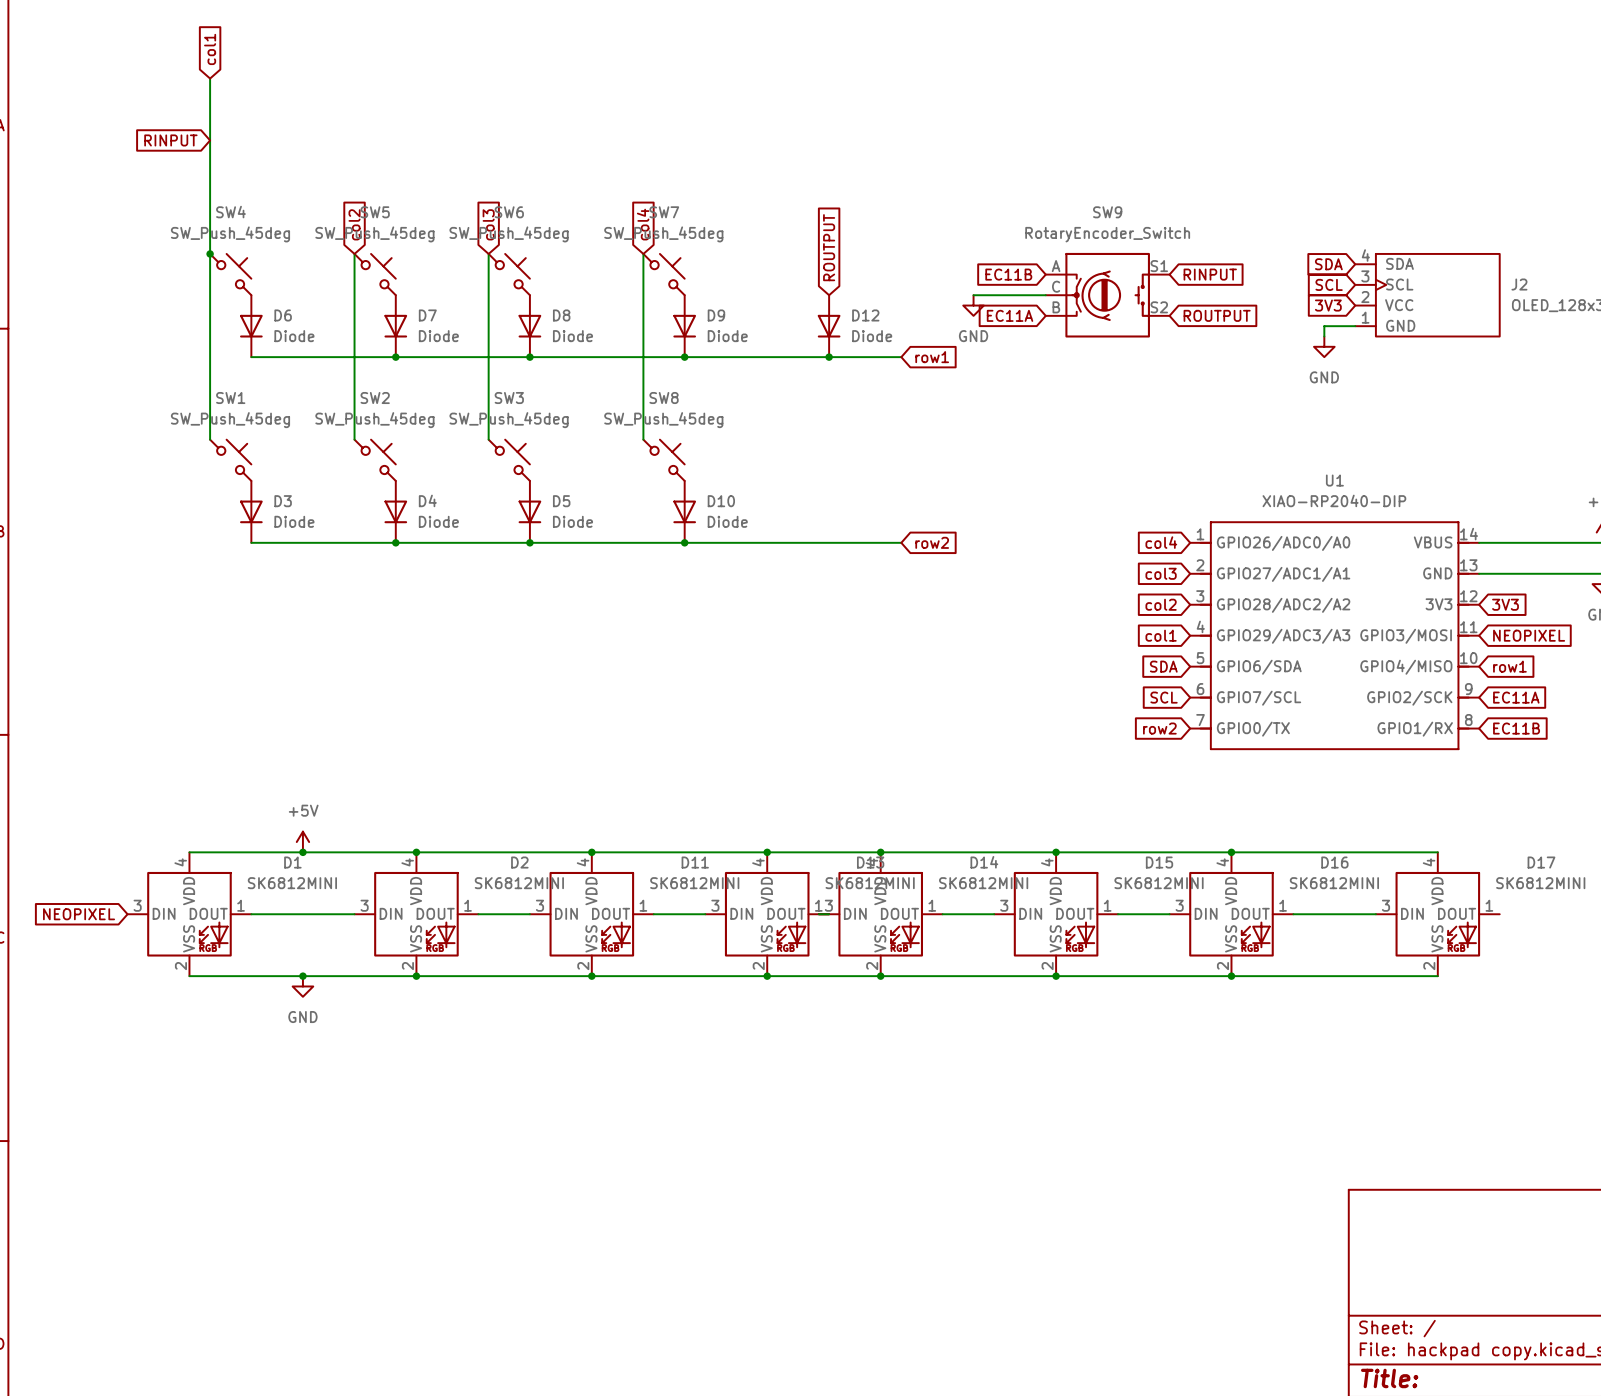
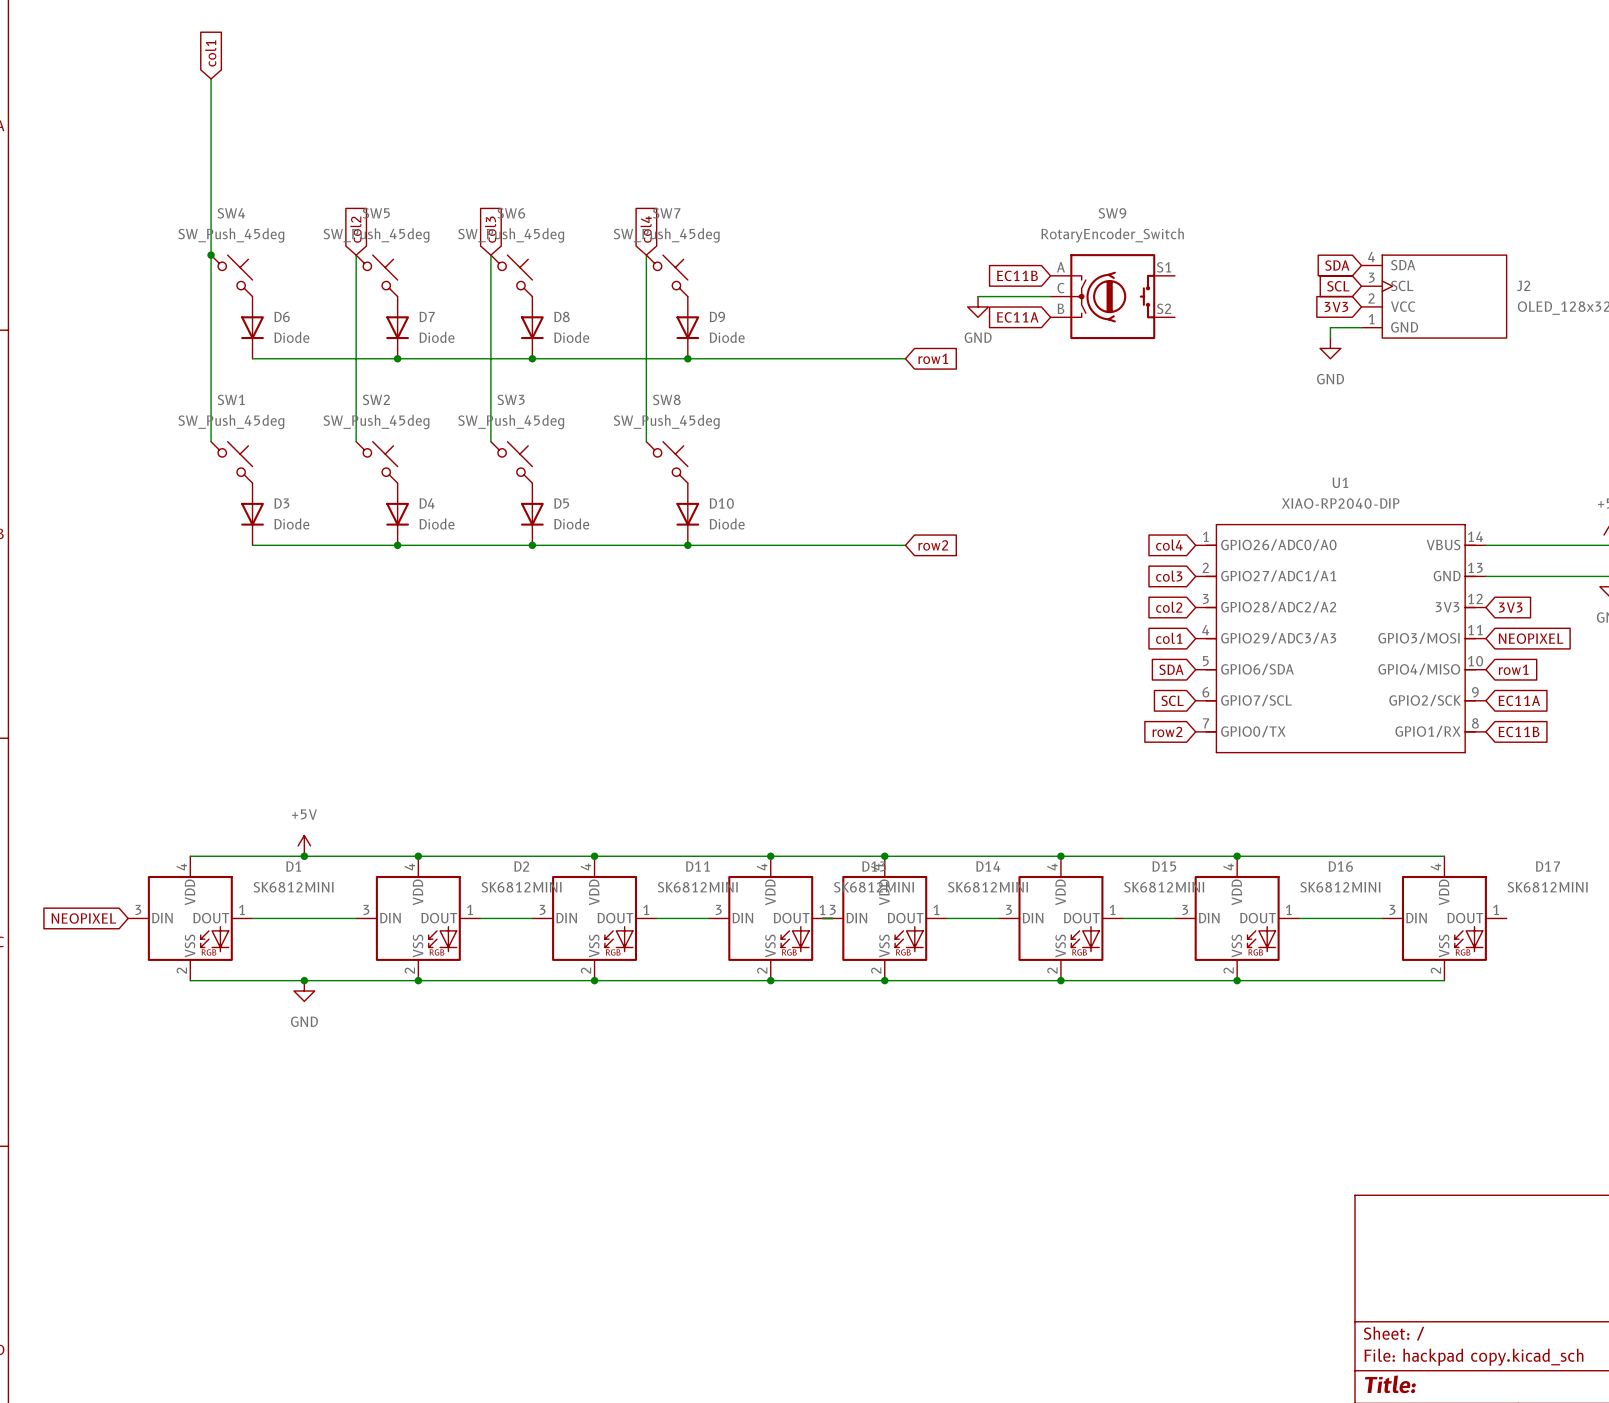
global label: RINPUT (170, 140) -> none
global label: ROUTPUT (829, 247) -> none
global label: RINPUT (1210, 274) -> none
global label: ROUTPUT (1217, 315) -> none
D12: Diode (829, 326) -> none
junction: (829, 357) -> none

